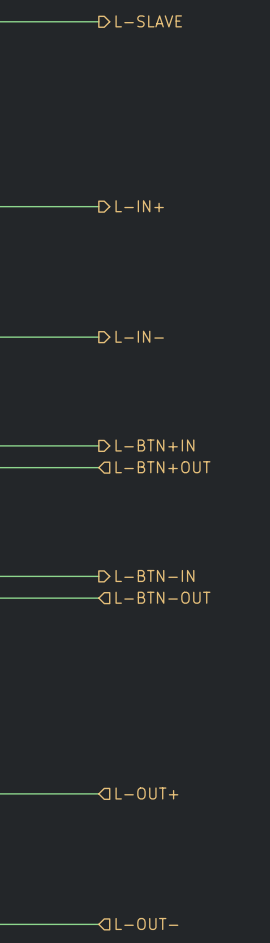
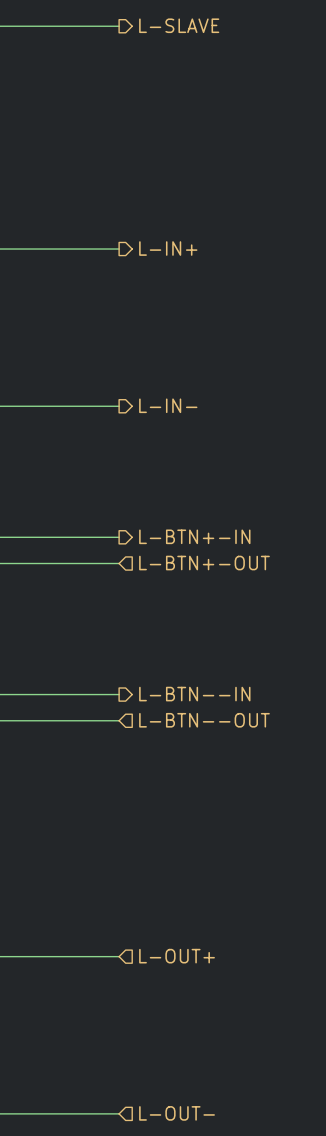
hierarchical label: L-BTN+IN (154, 445) -> L-BTN+-IN (194, 536)
hierarchical label: L-BTN+OUT (162, 467) -> L-BTN+-OUT (204, 563)
hierarchical label: L-BTN-IN (154, 575) -> L-BTN--IN (194, 694)
hierarchical label: L-BTN-OUT (162, 597) -> L-BTN--OUT (204, 720)

